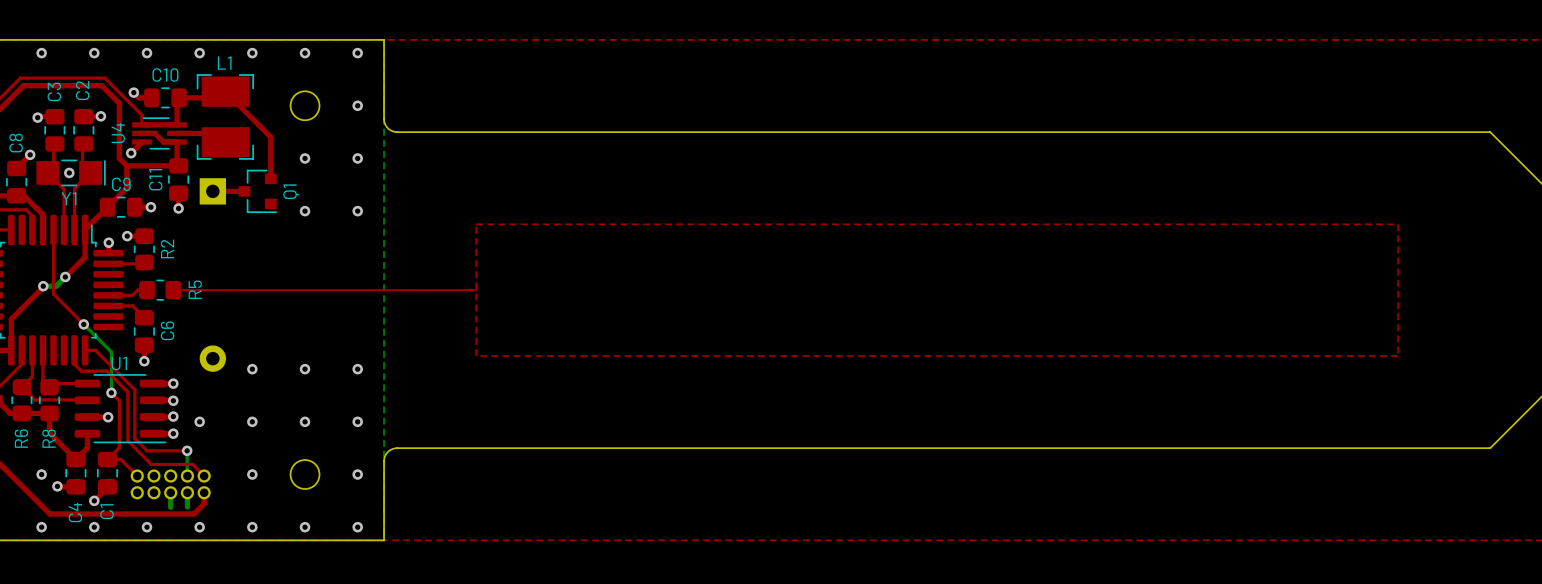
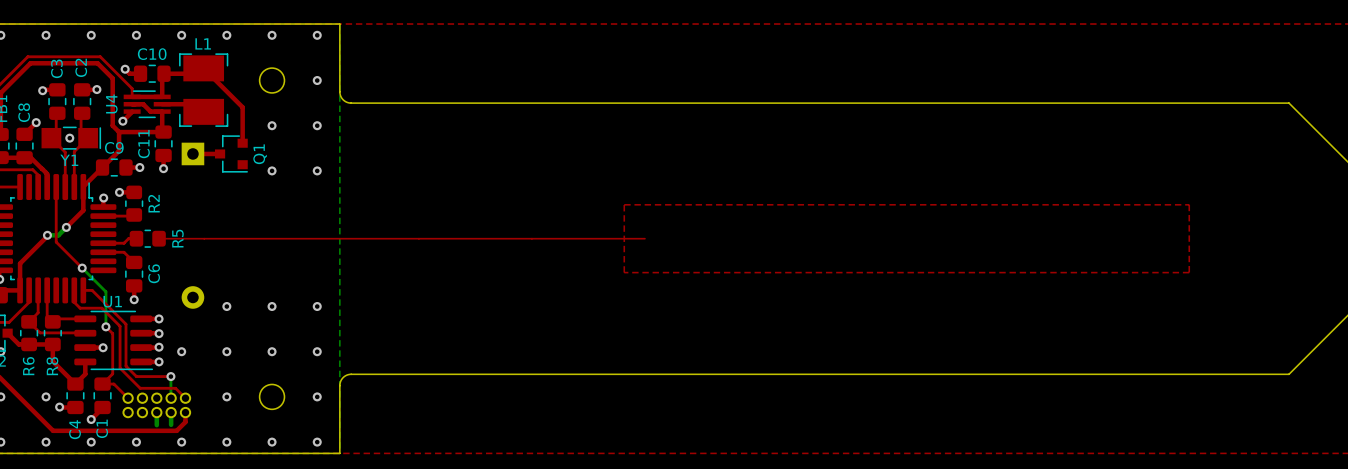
top zone outline: (476, 224) (476, 355) (1398, 355) (1398, 224) (476, 224) -> none
top zone outline: none -> (624, 204) (624, 272) (1189, 272) (1189, 204) (624, 204)
top track: none -> (418, 238) (644, 238)

